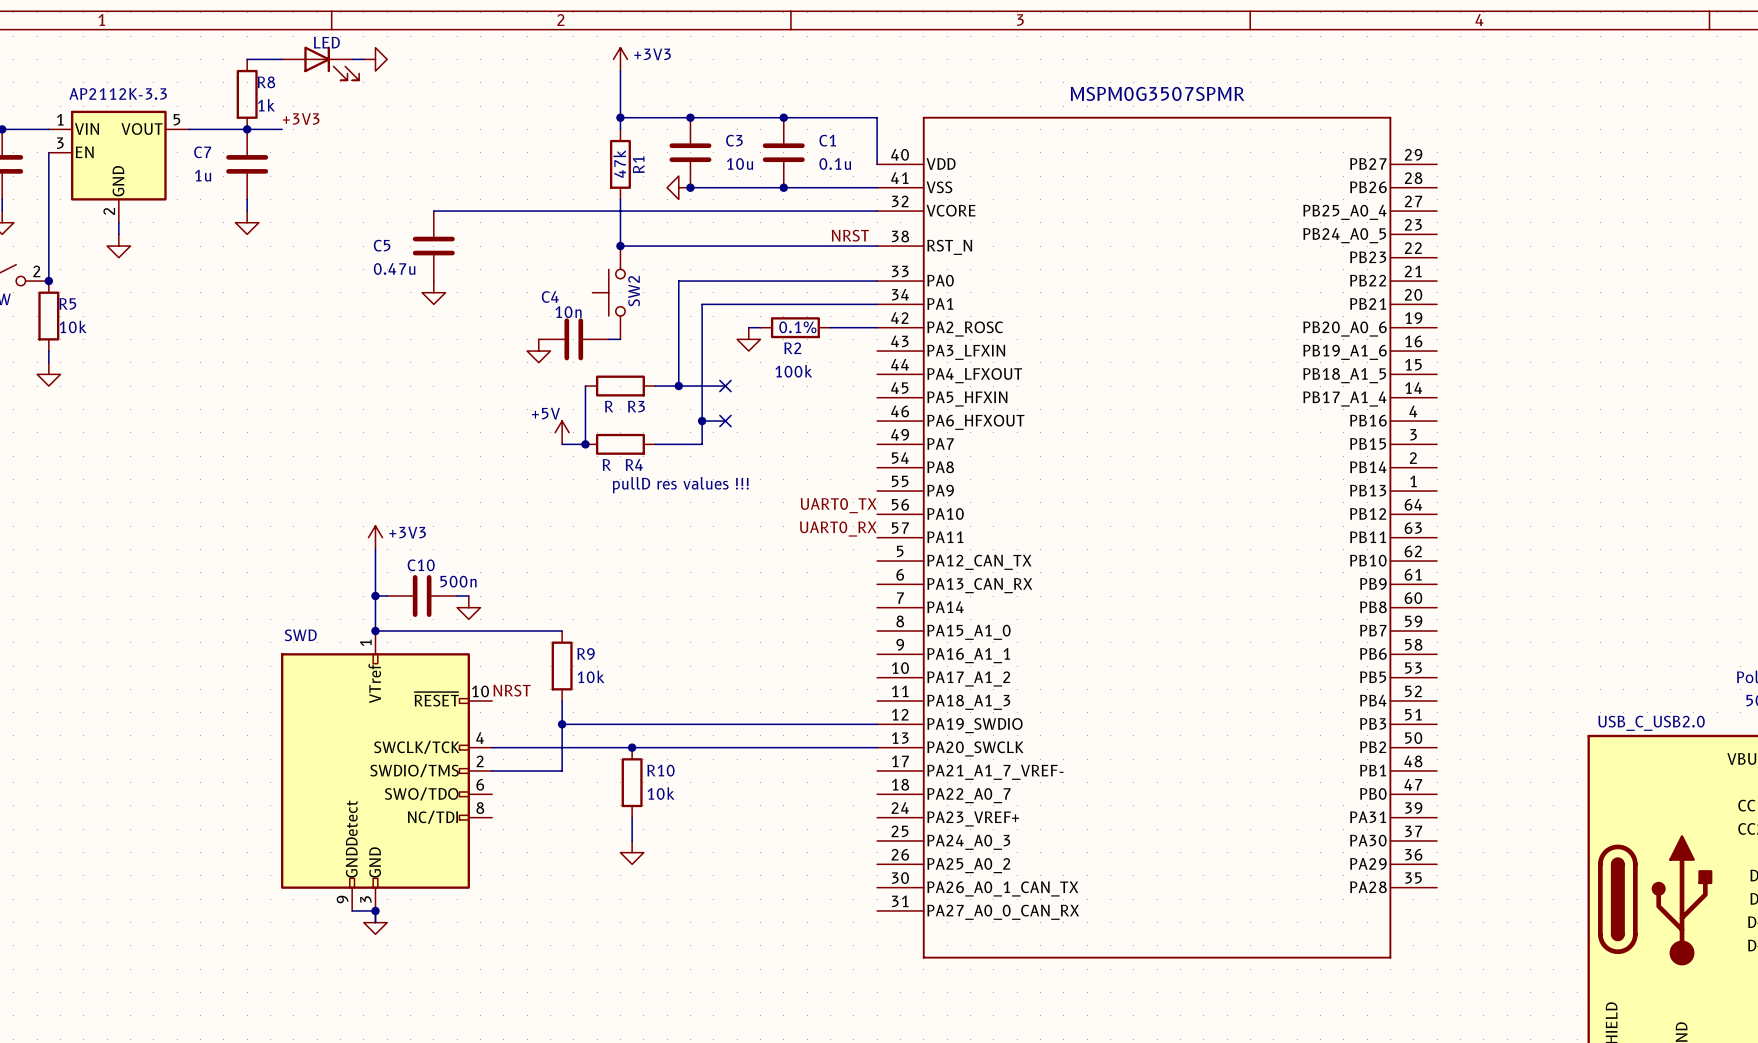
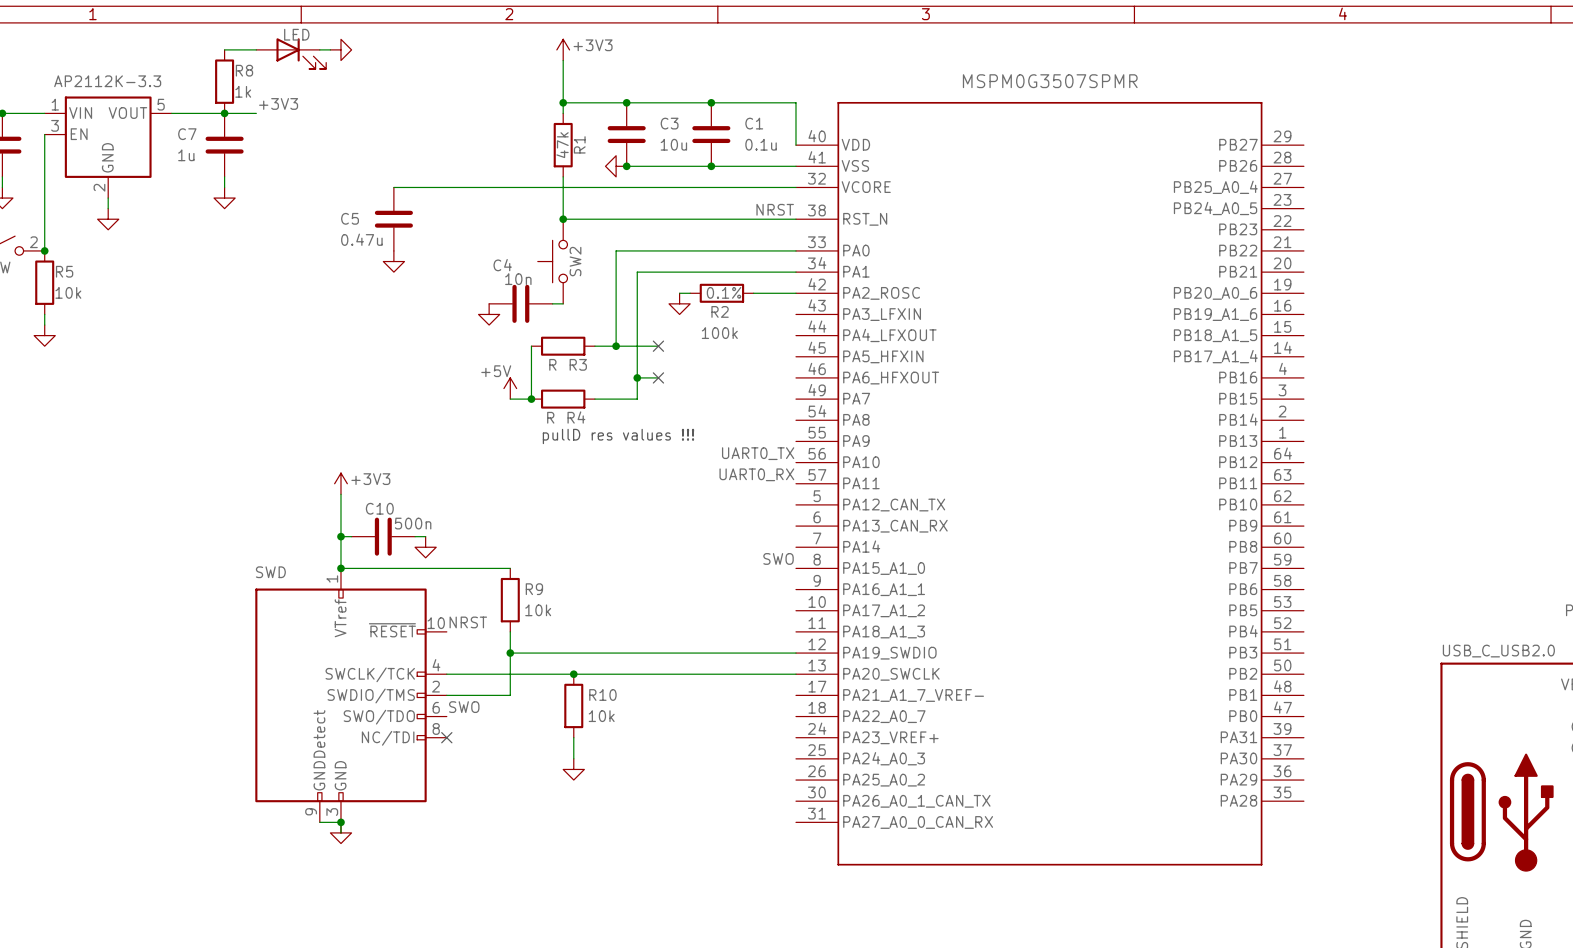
label: none -> SWO (778, 558)
label: none -> SWO (464, 707)
no-connect mark: none -> (446, 737)

